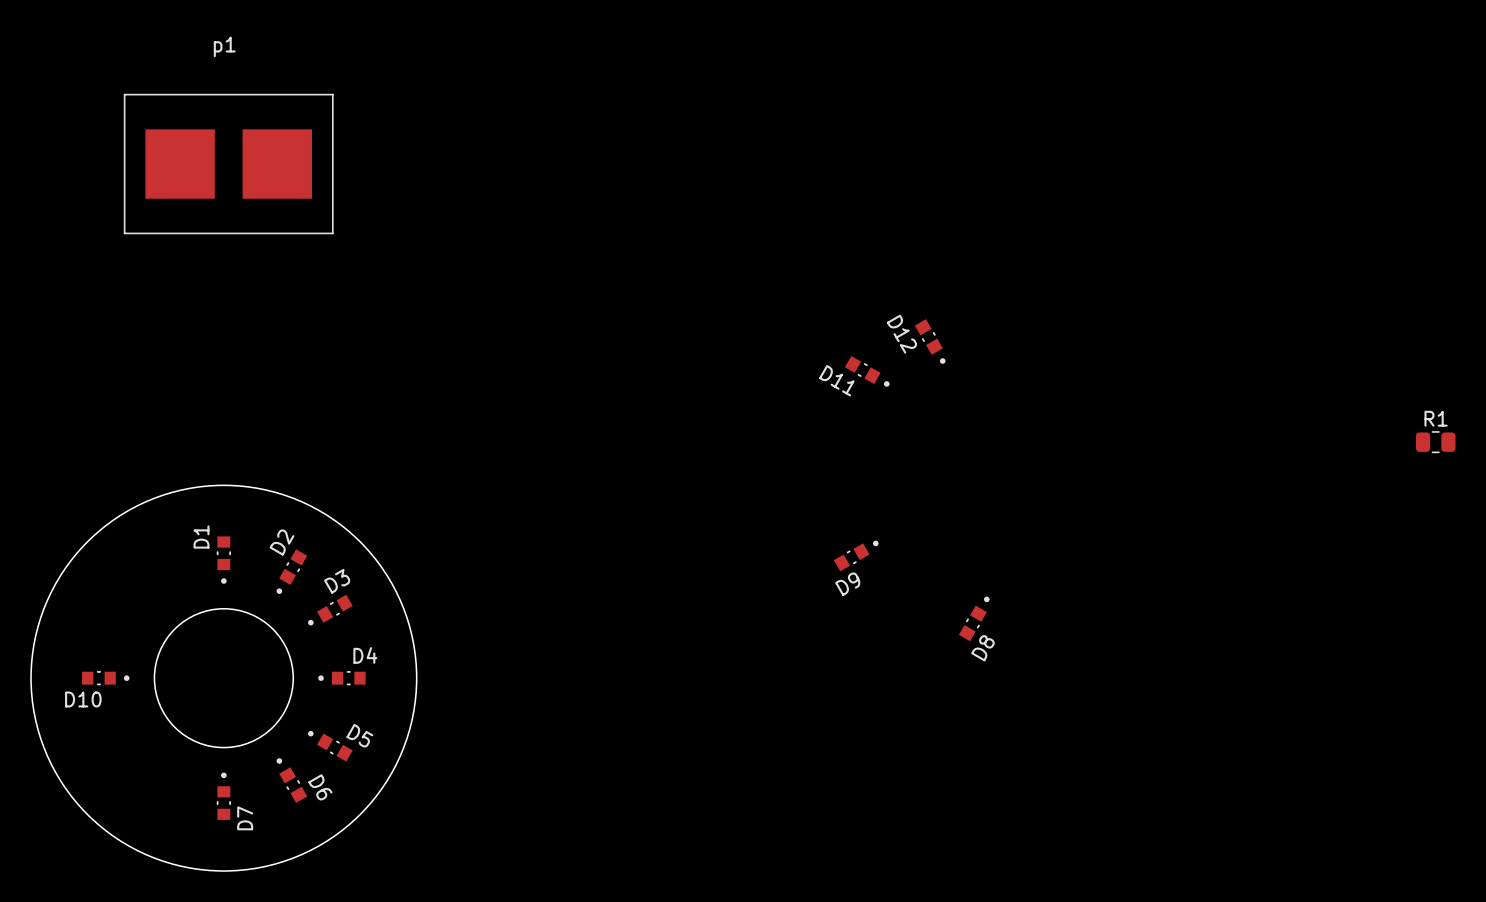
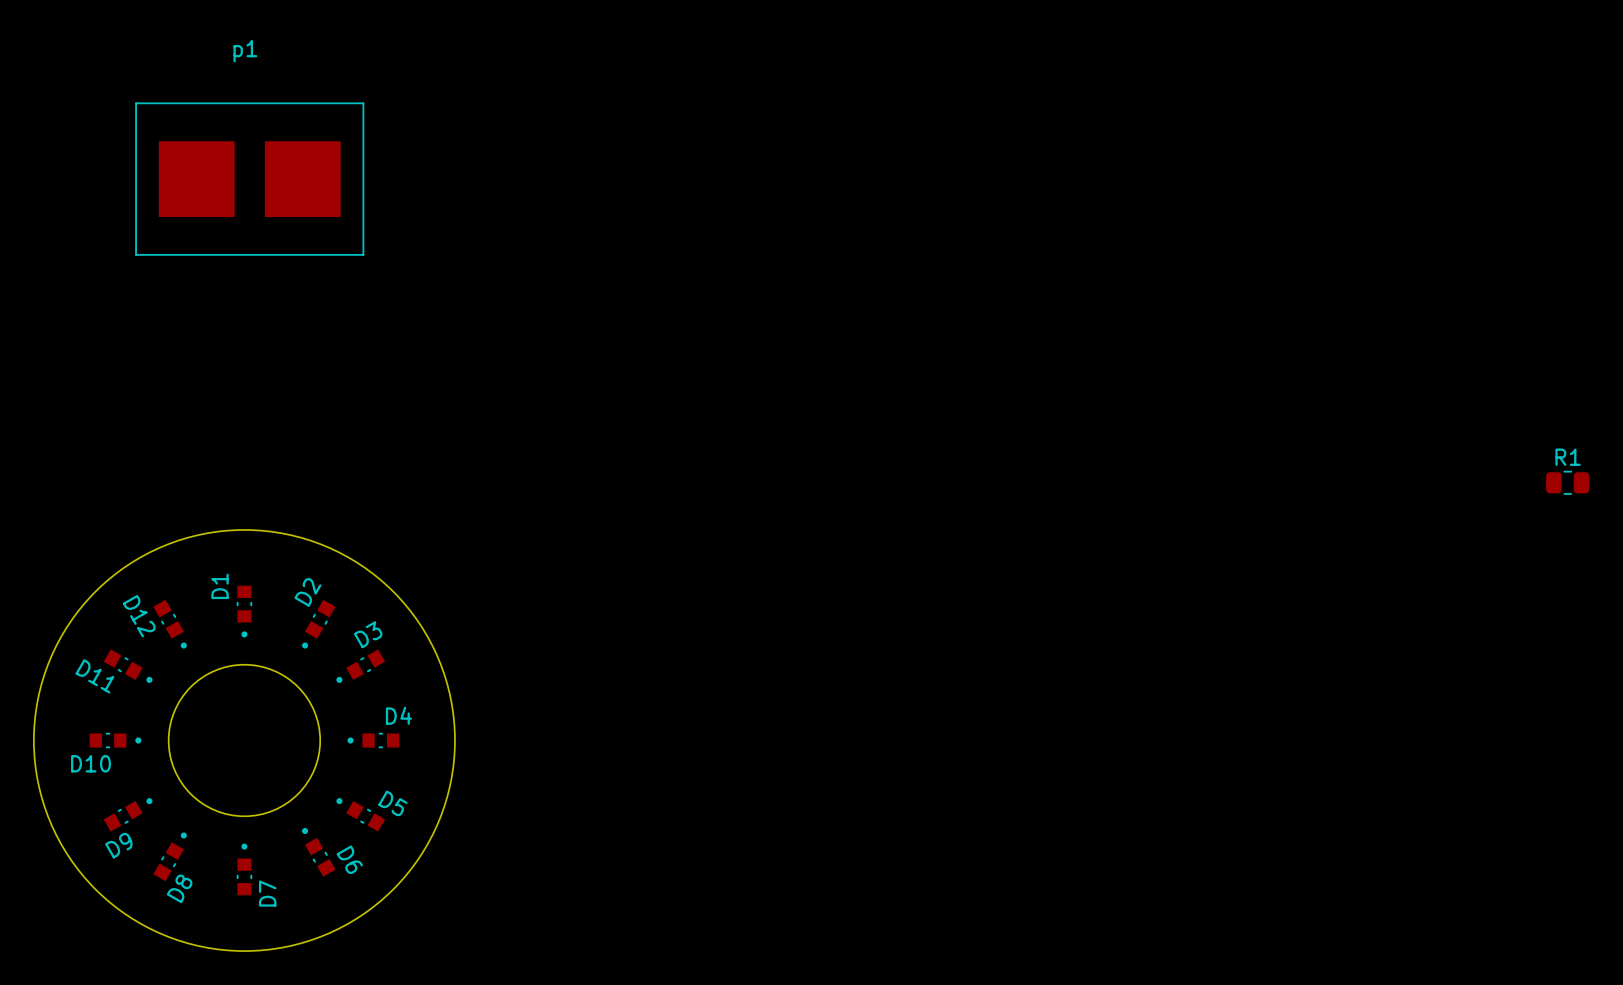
D12 position: (930, 341) -> (170, 624)
D11 position: (867, 371) -> (128, 666)
D9 position: (856, 556) -> (128, 814)
D8 position: (974, 618) -> (170, 856)

